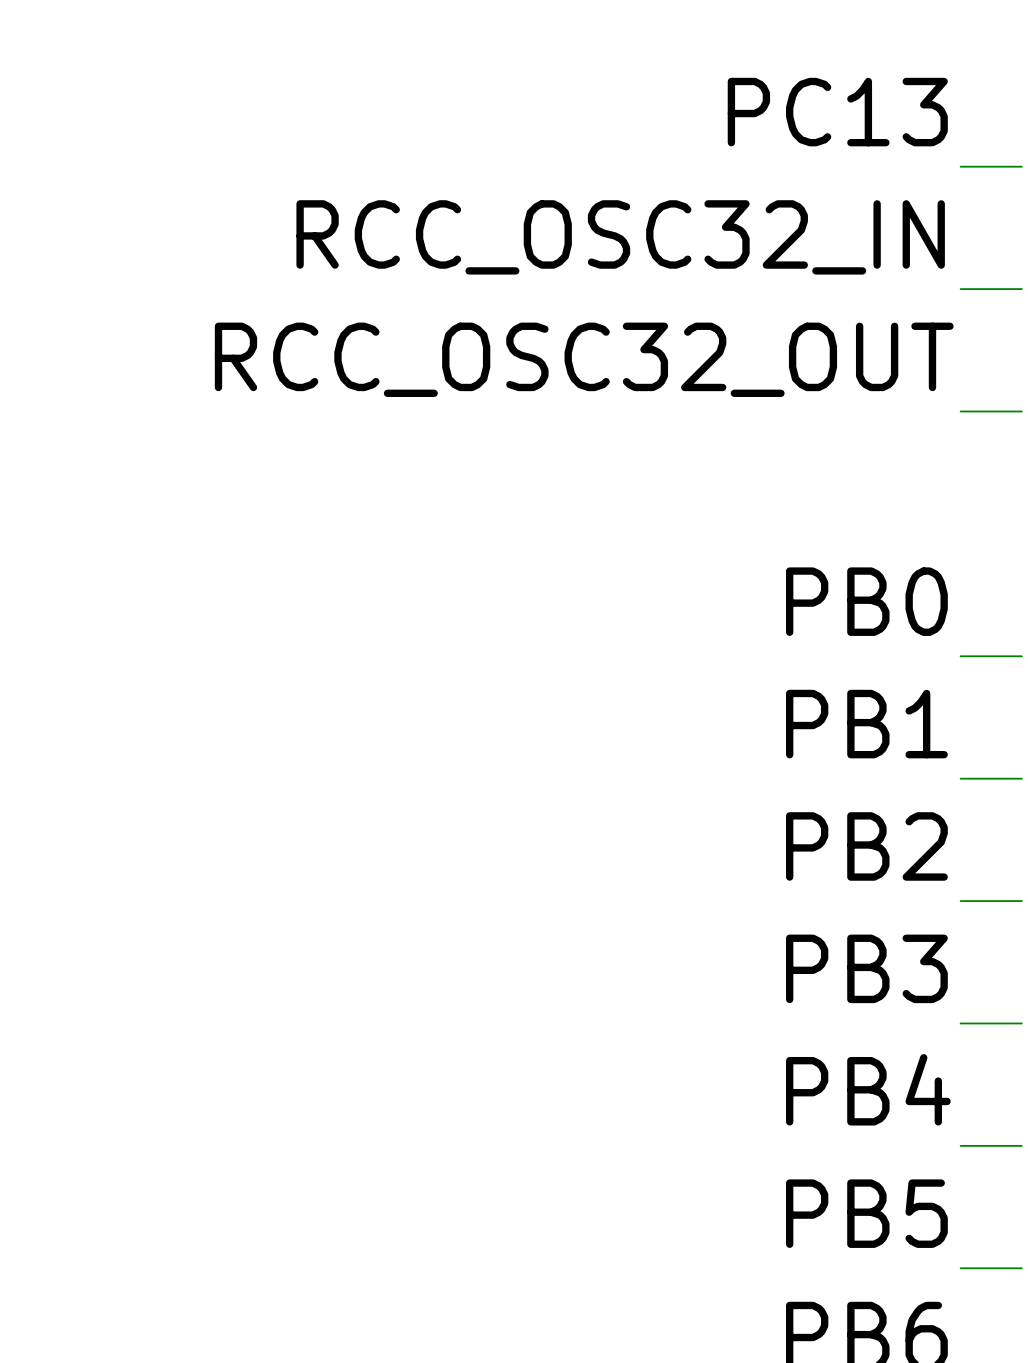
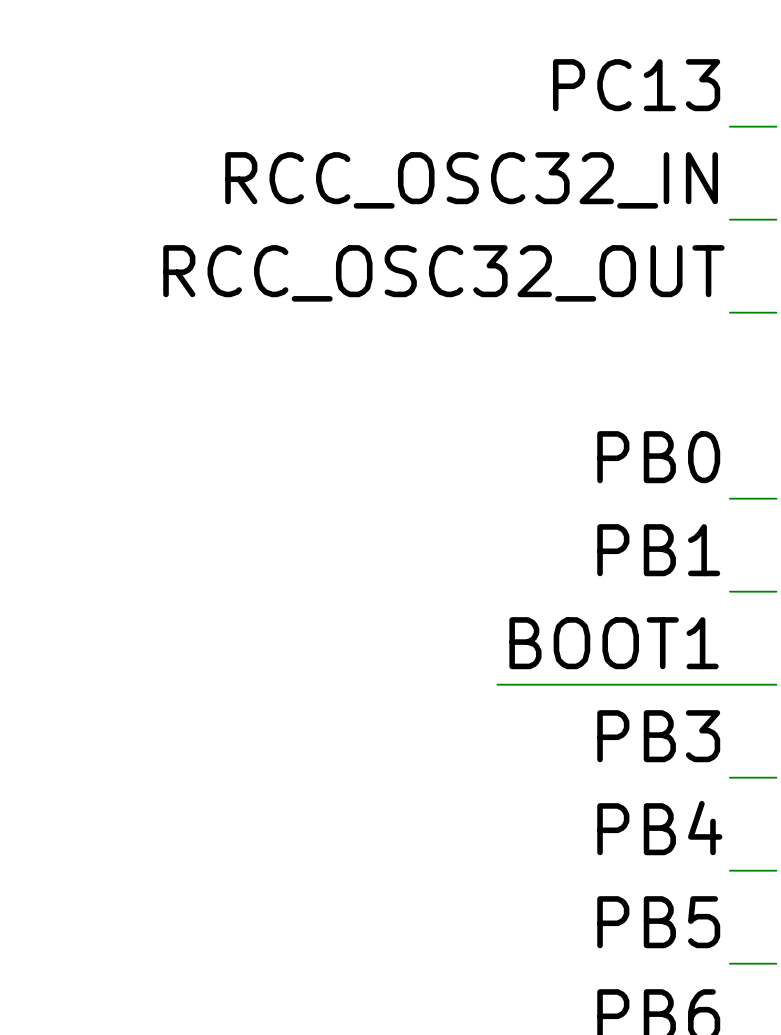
label: none -> BOOT1 (614, 643)
label: PB2 (866, 846) -> none
wire: none -> (497, 684) (729, 684)

